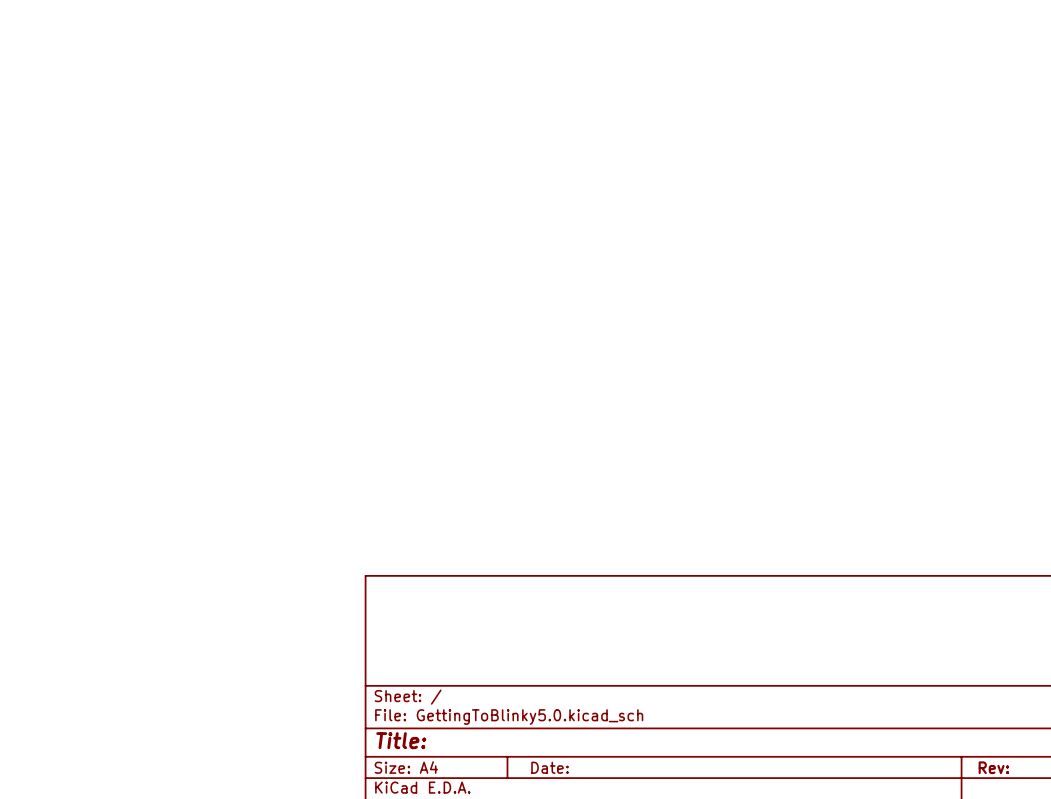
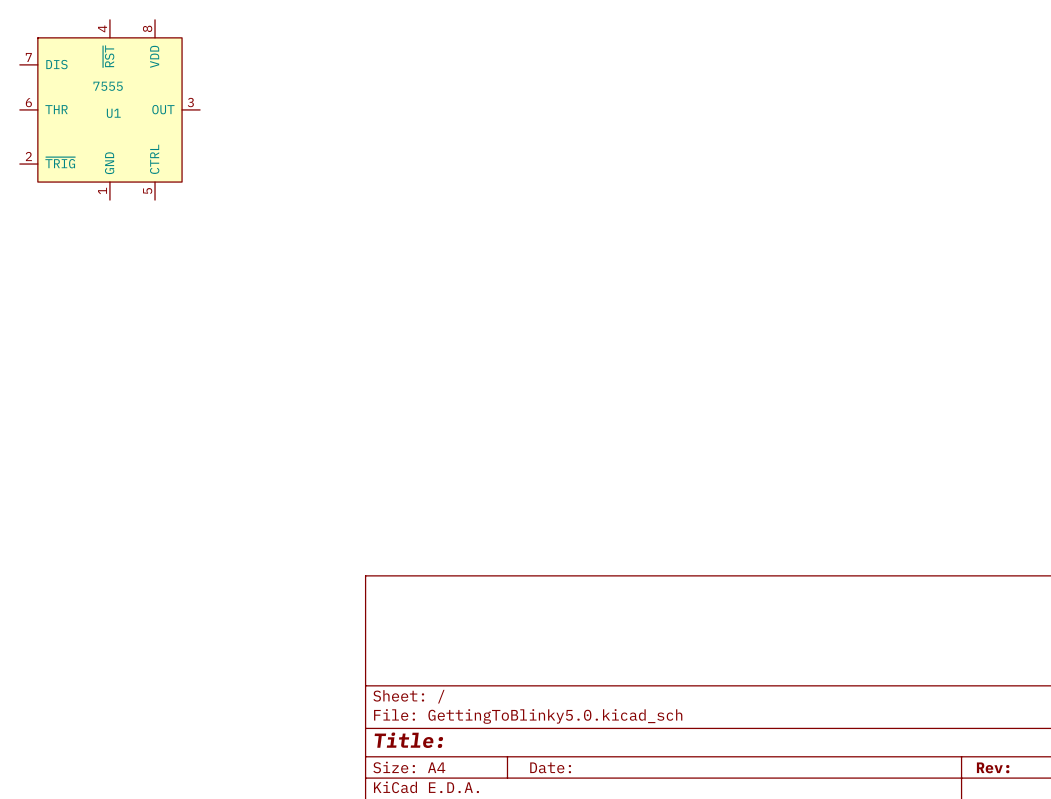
U1: none -> 7555 (109, 109)

